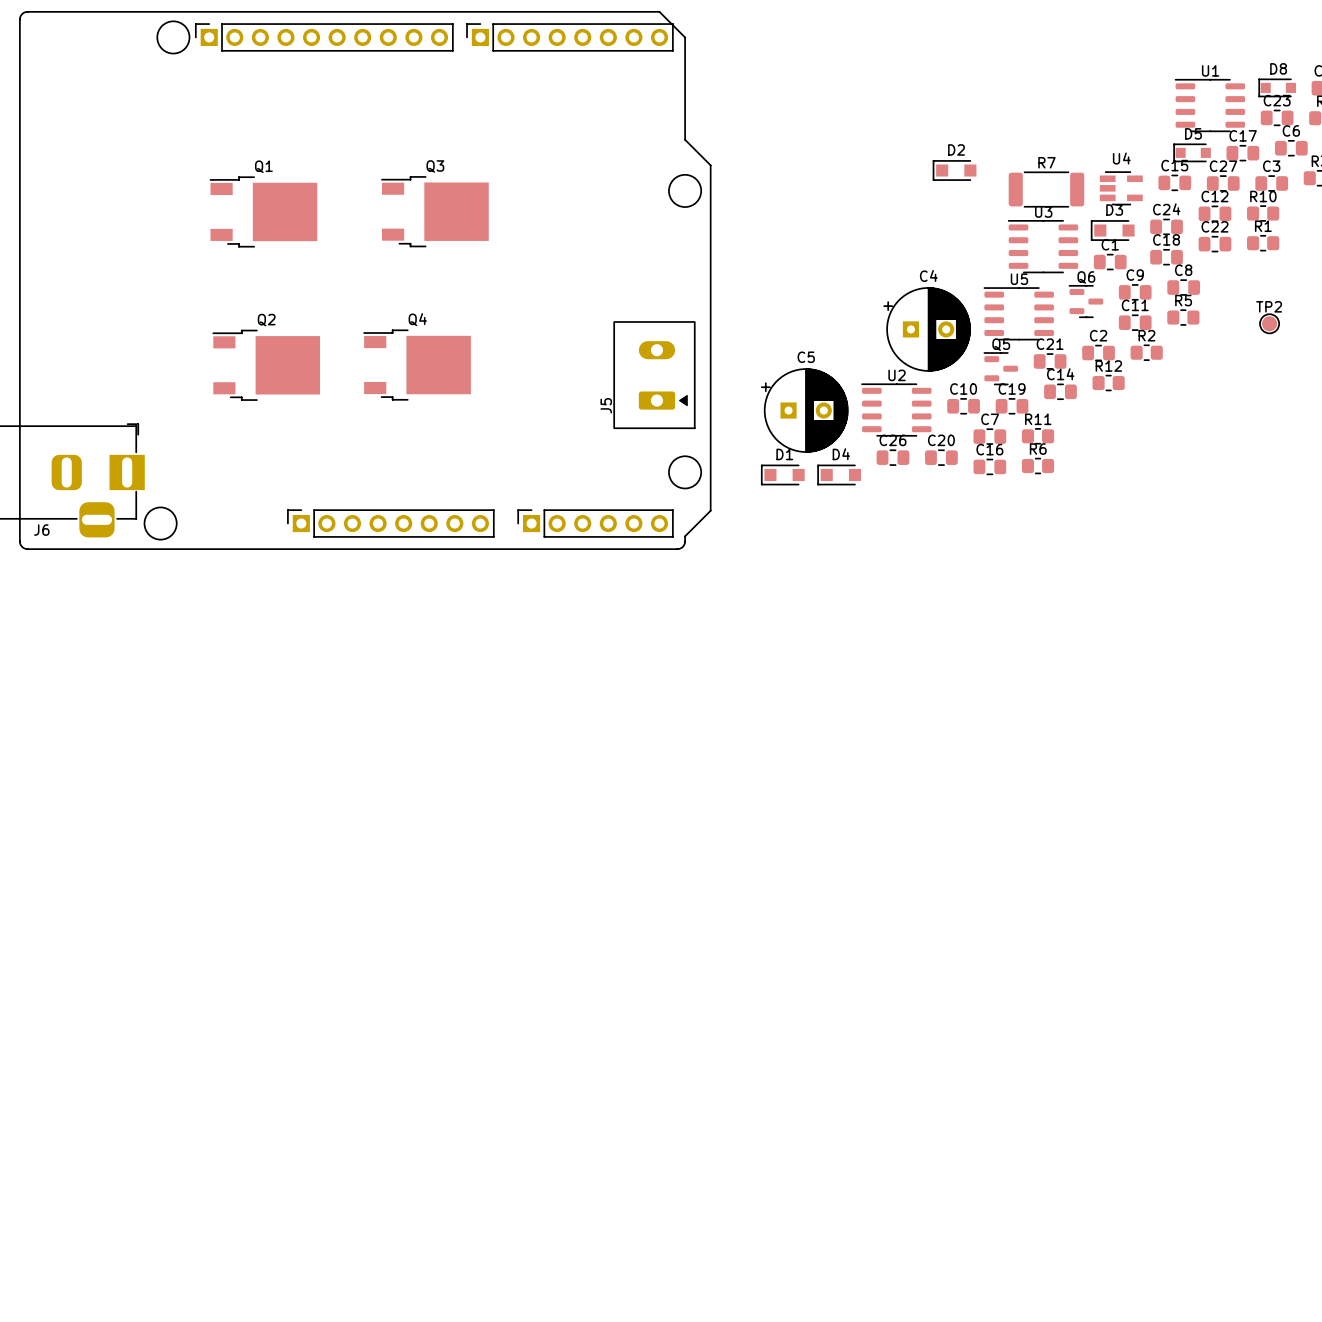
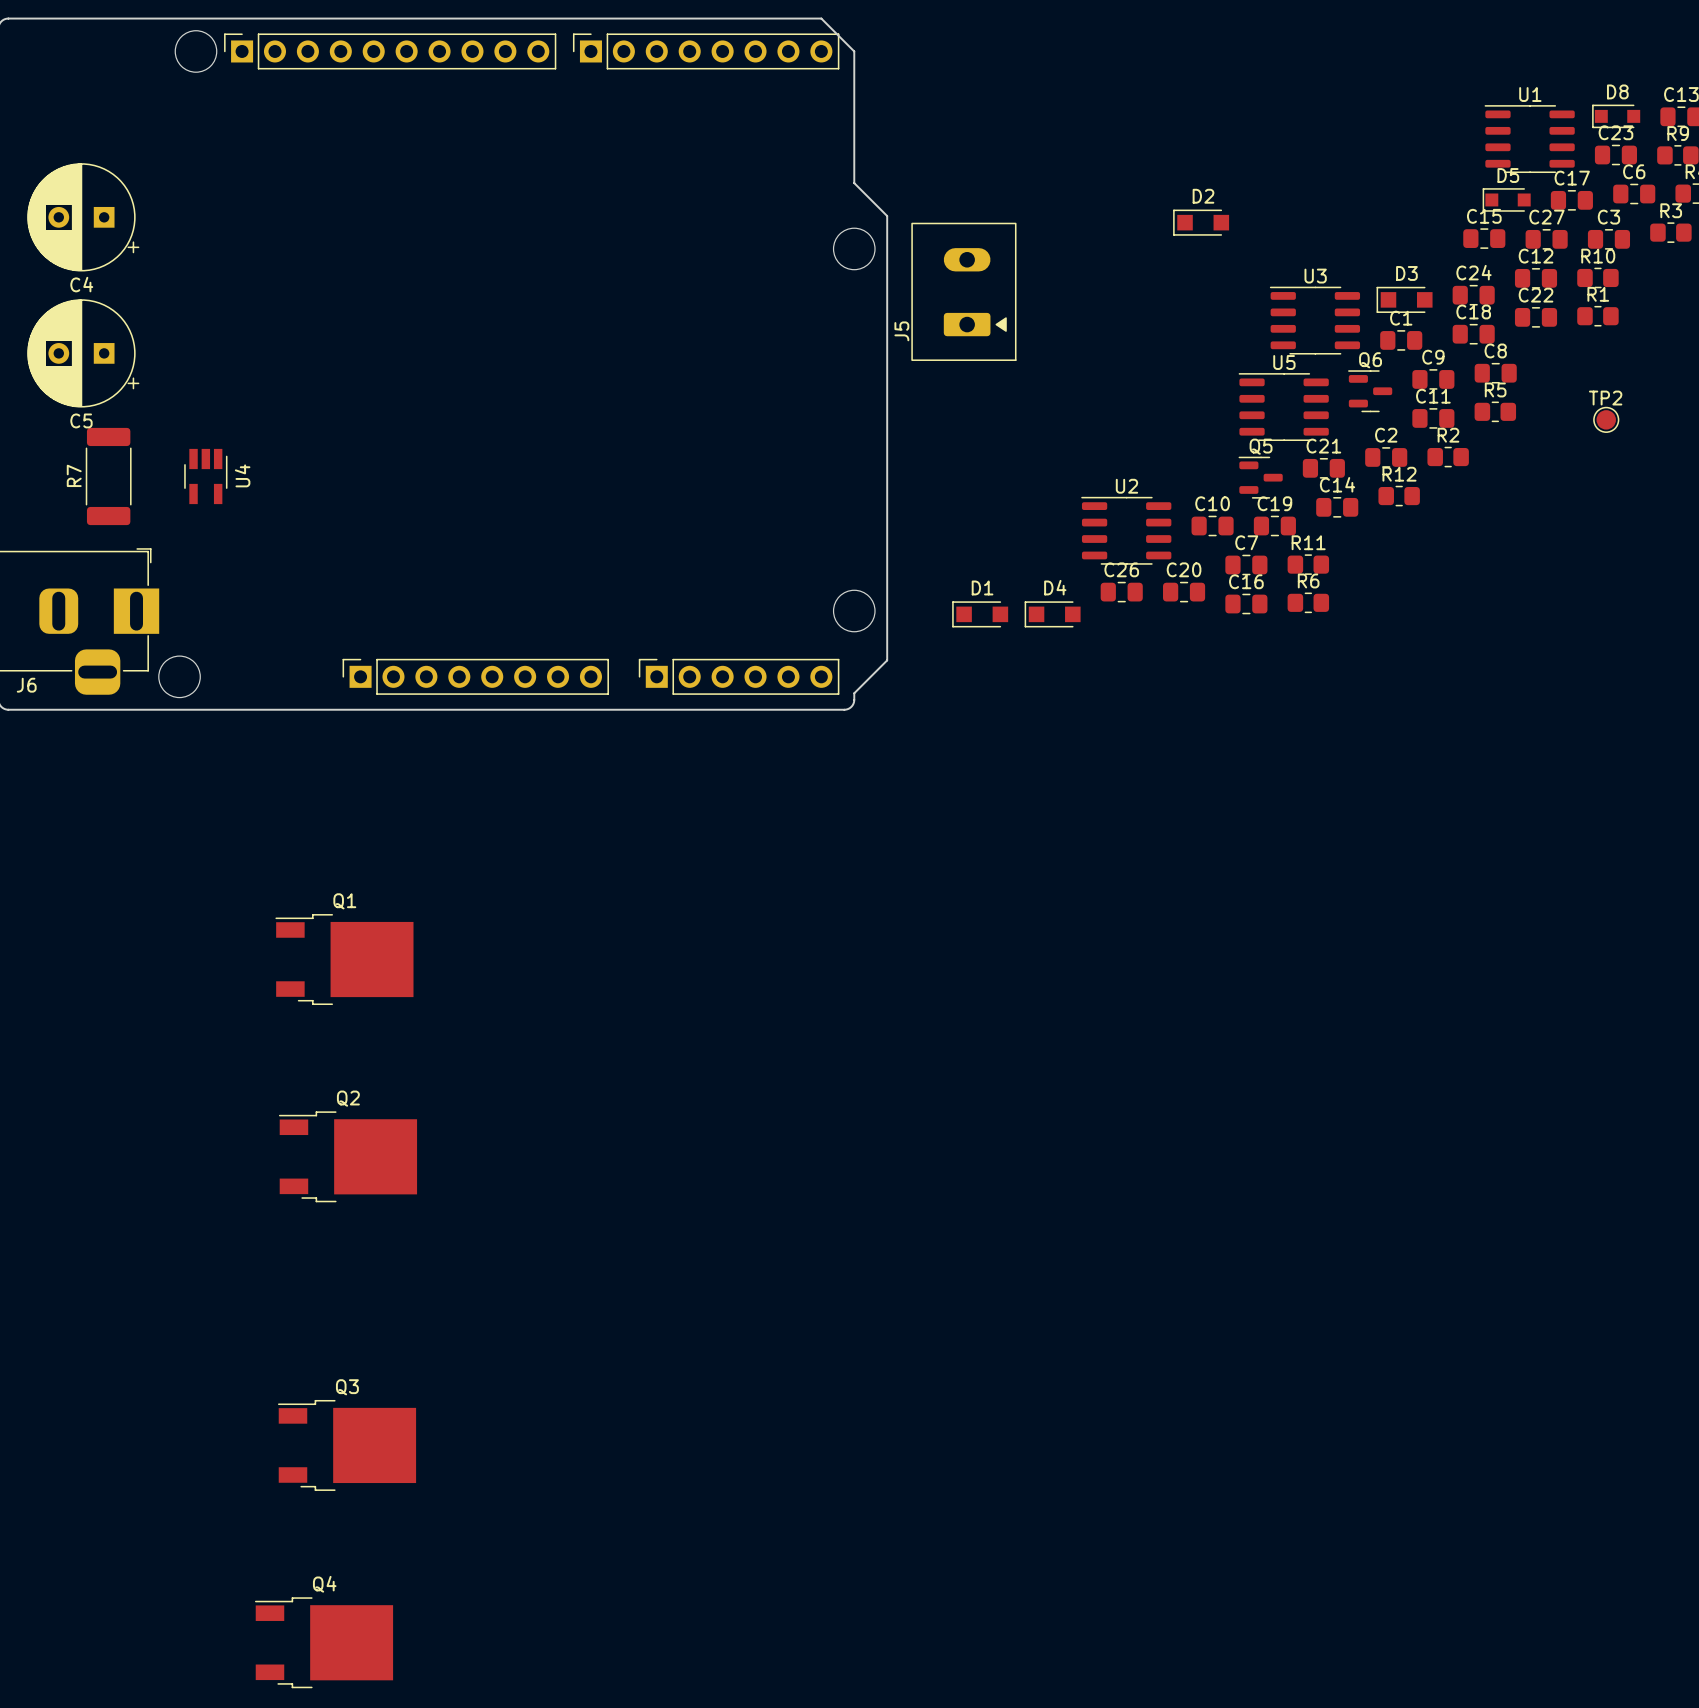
R7 name position: R7 (1046, 162) -> R7 (74, 475)
U4 rotation: 0° (1121, 188) -> 90° clockwise (205, 476)
U4 position: (1121, 188) -> (205, 476)
R7 rotation: 0° (1046, 189) -> 90° clockwise (108, 476)
R7 position: (1046, 189) -> (108, 476)
Q1 position: (263, 211) -> (344, 959)
Q3 position: (435, 211) -> (347, 1445)
C4 rotation: 0° (927, 329) -> 180° (83, 217)
C4 position: (927, 329) -> (83, 217)
Q2 position: (266, 365) -> (347, 1156)
Q4 position: (417, 365) -> (324, 1642)
J5 position: (654, 375) -> (963, 291)
C5 rotation: 0° (804, 410) -> 180° (83, 353)
C5 position: (804, 410) -> (83, 353)

